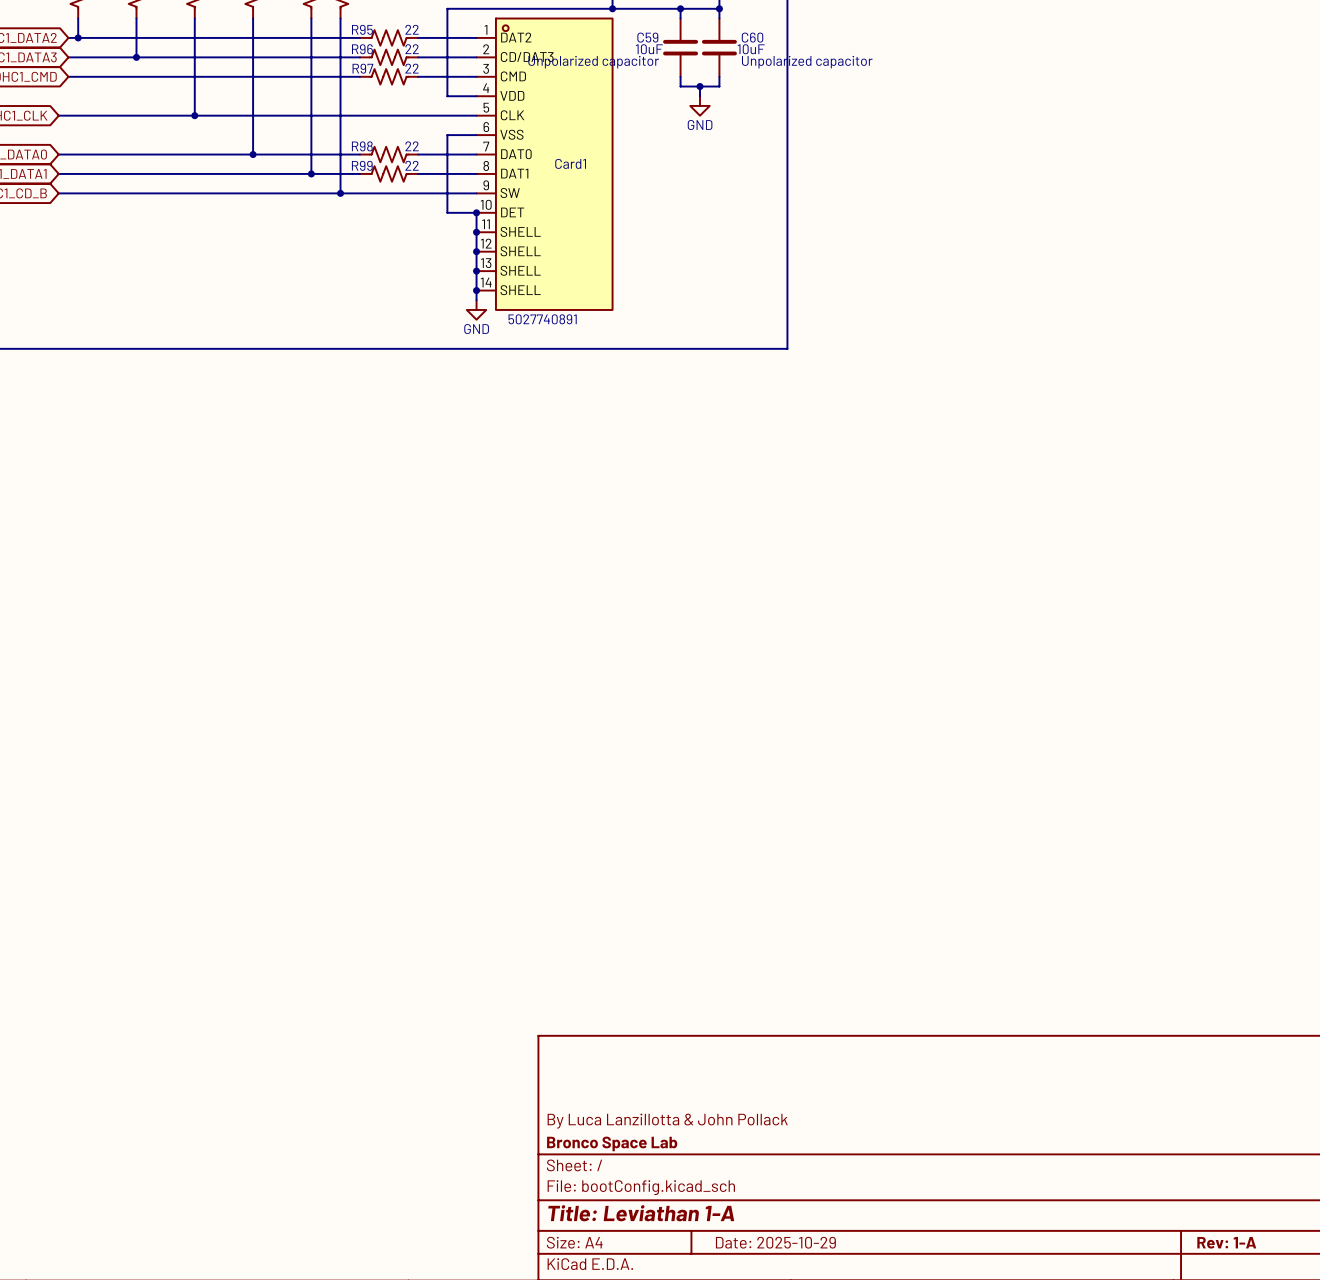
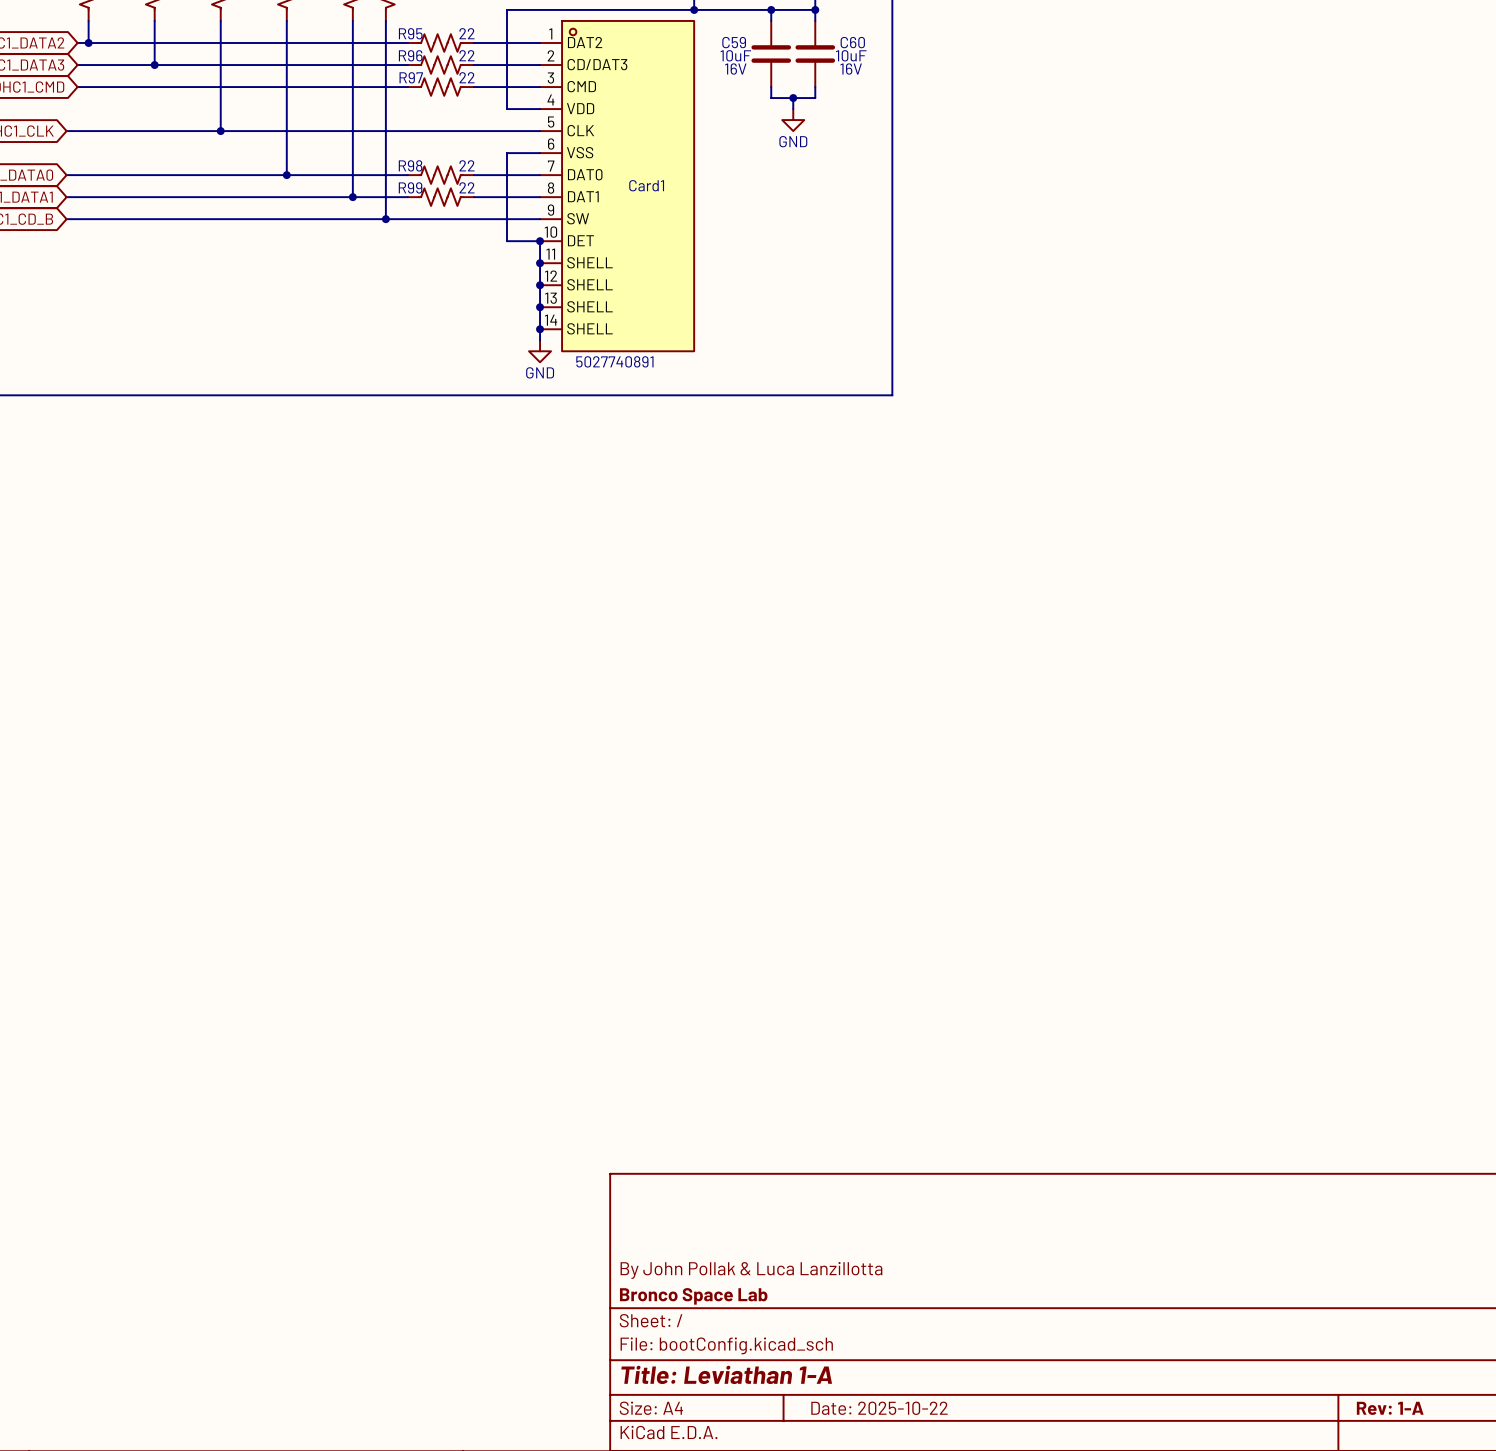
C59 text: Unpolarized capacitor (593, 62) -> 16V (735, 69)
C60 text: Unpolarized capacitor (807, 62) -> 16V (851, 69)
title block: By Luca Lanzillotta & John Pollack (667, 1121) -> By John Pollak & Luca Lanzillotta (751, 1270)
title block: Date: 2025-10-29 (775, 1242) -> Date: 2025-10-22 (879, 1408)

